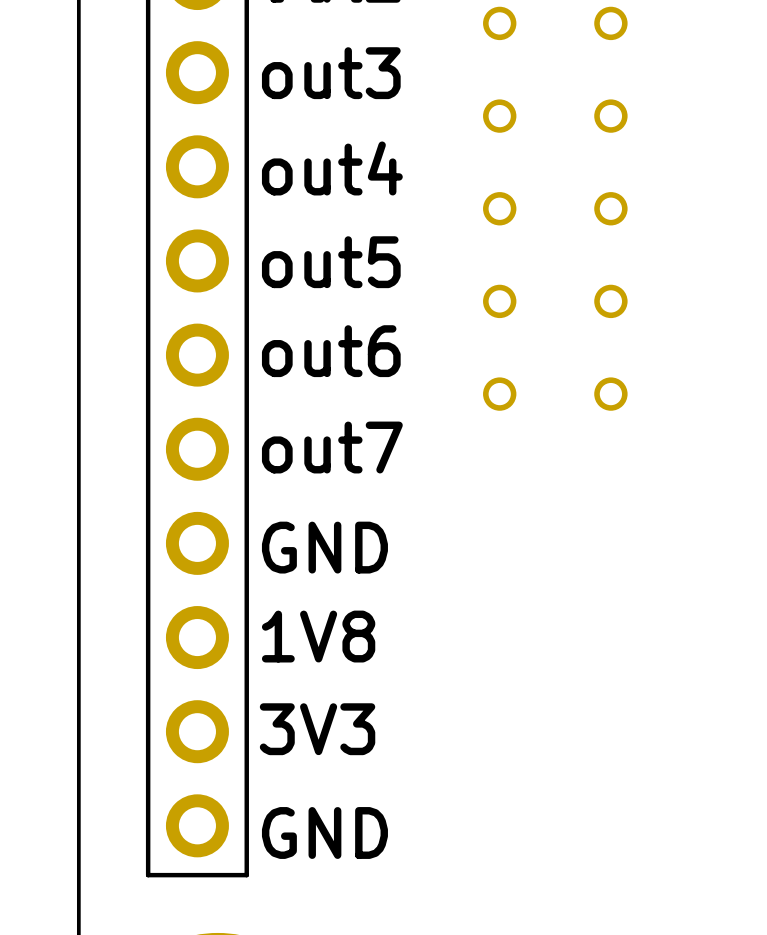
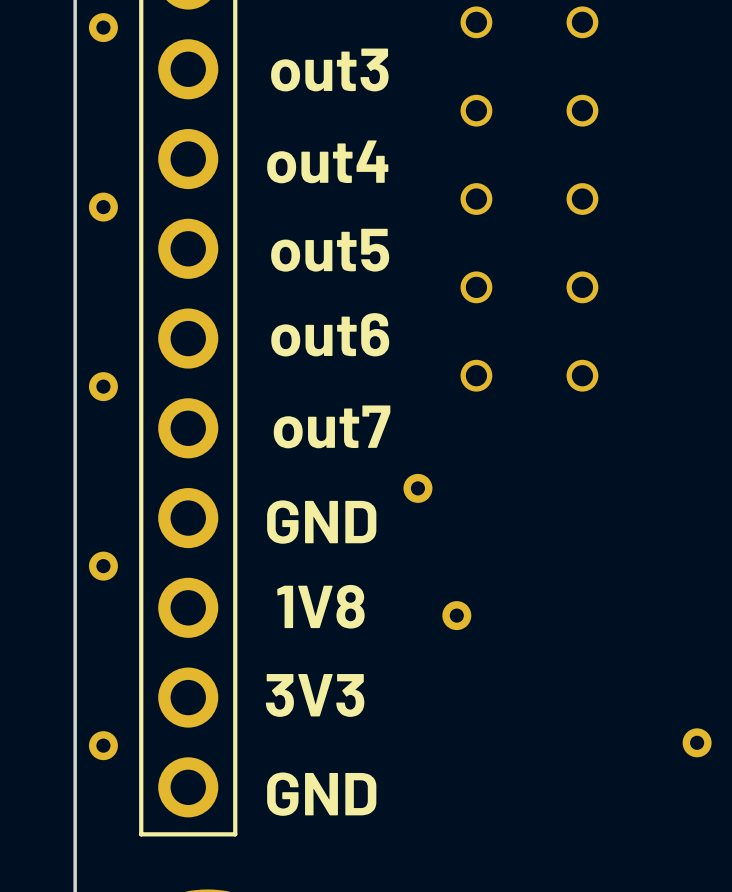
part: none -> (103, 27)
part: none -> (103, 207)
part: none -> (103, 386)
part: none -> (417, 488)
part: none -> (103, 566)
part: none -> (456, 615)
part: none -> (697, 742)
part: none -> (103, 745)

